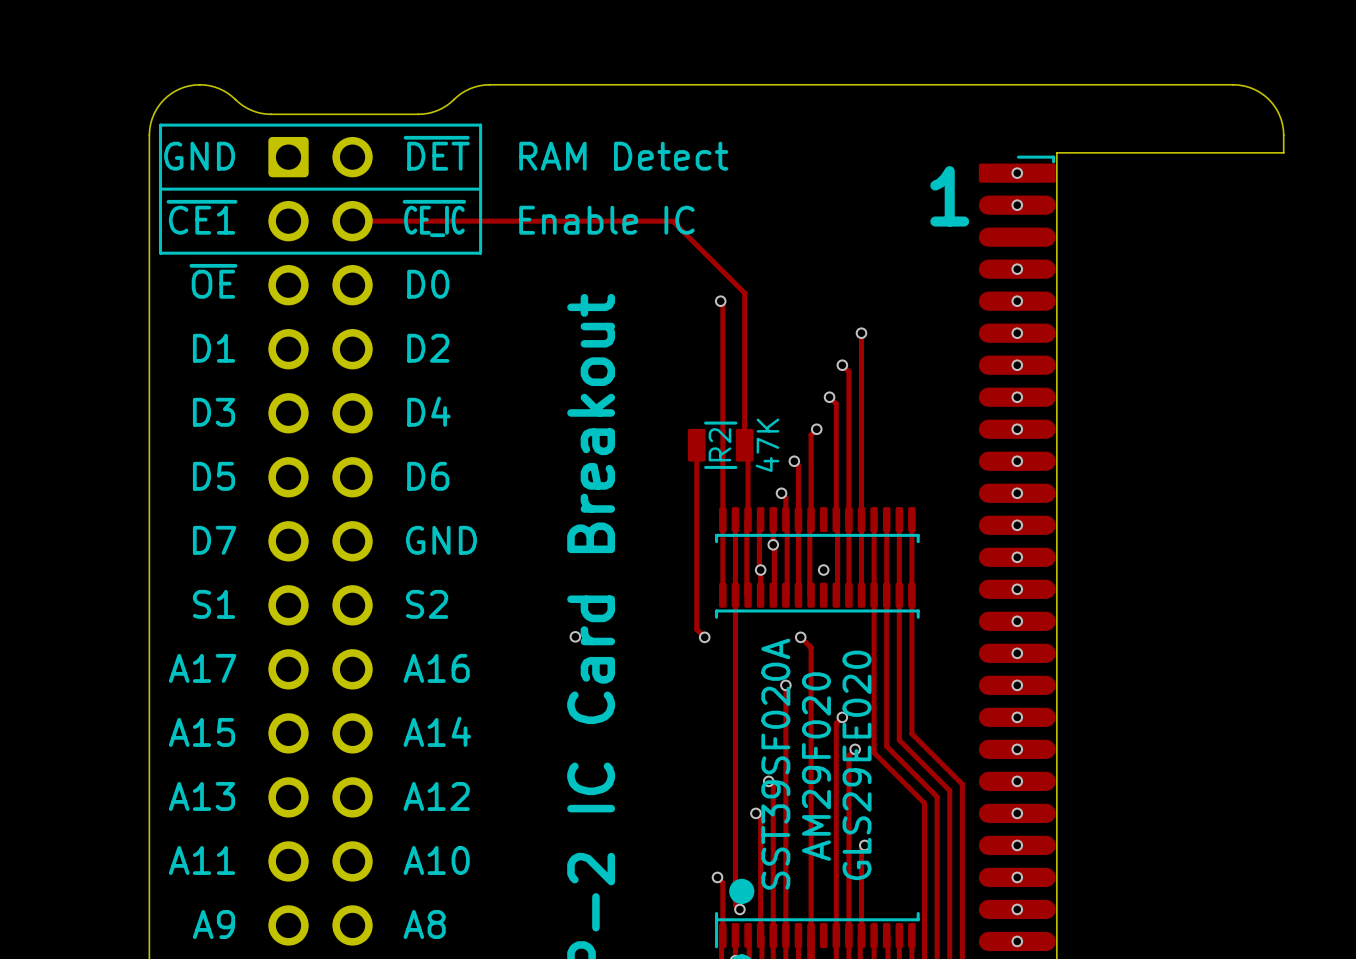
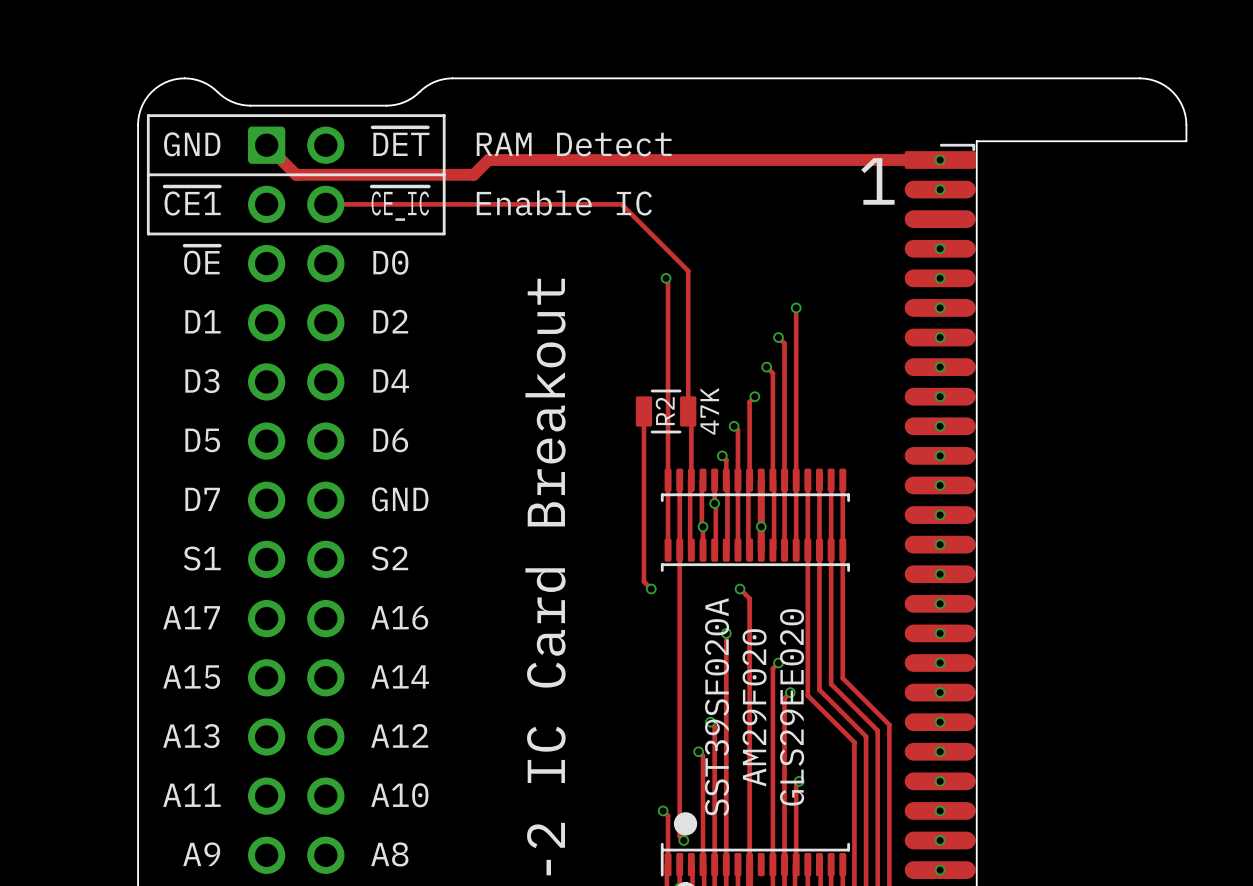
track: none -> (266, 145) (296, 174) (473, 174) (488, 160) (940, 160)
track: none -> (761, 480) (761, 550)
via: (575, 636) -> none

